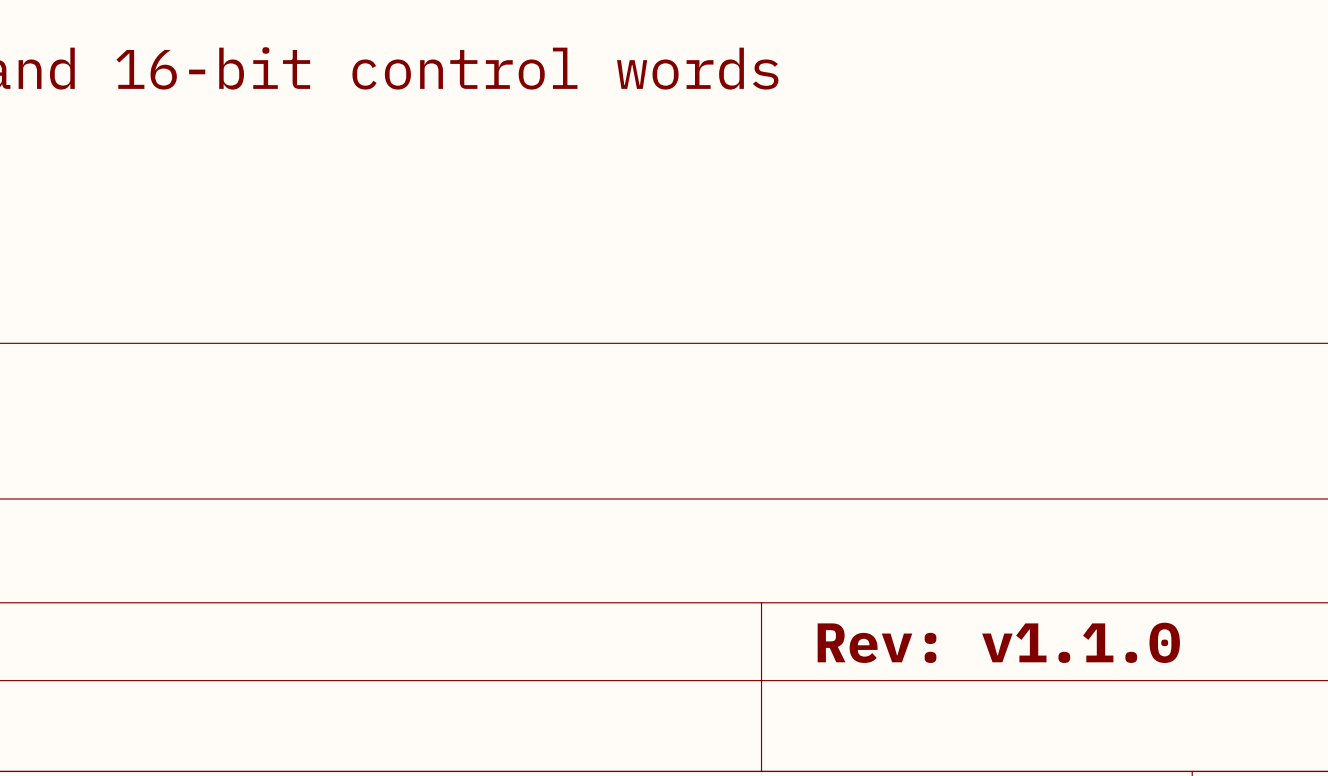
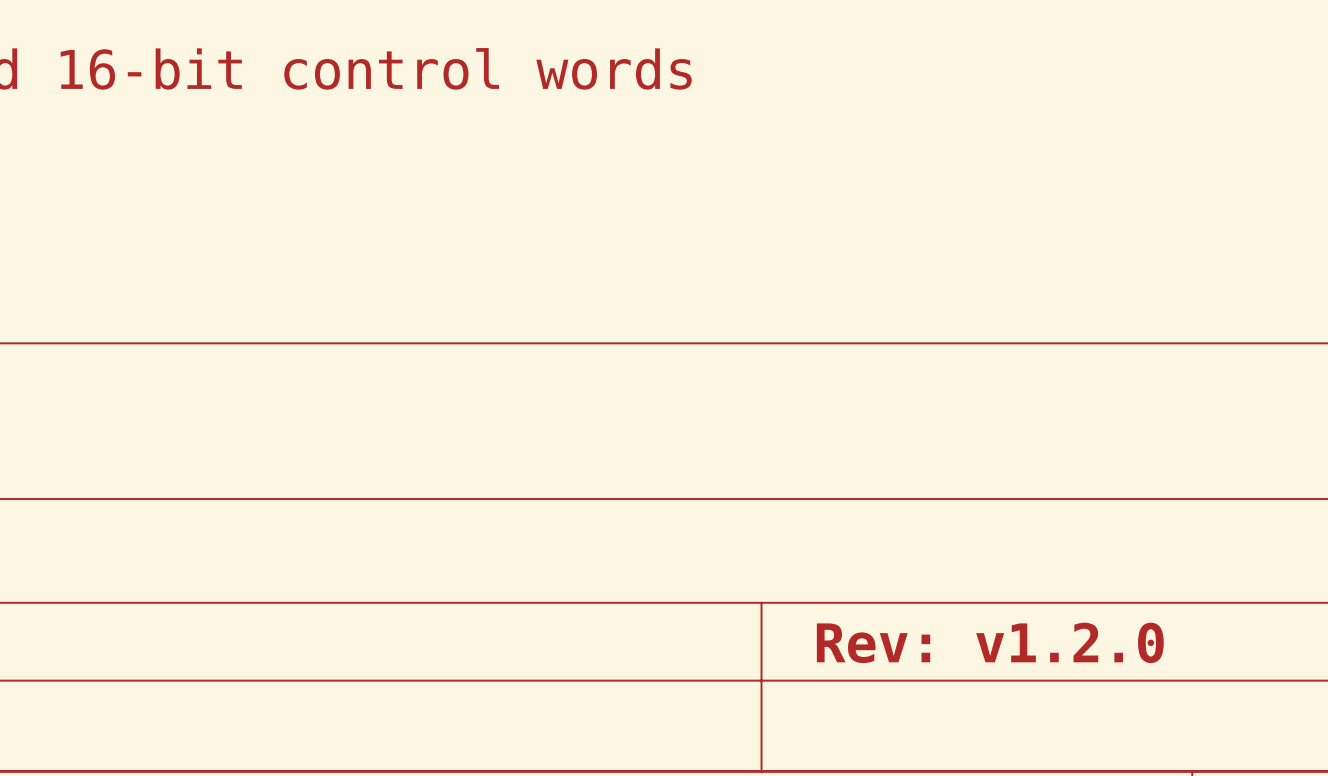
title block: Rev: v1.1.0 (998, 642) -> Rev: v1.2.0 (990, 642)

